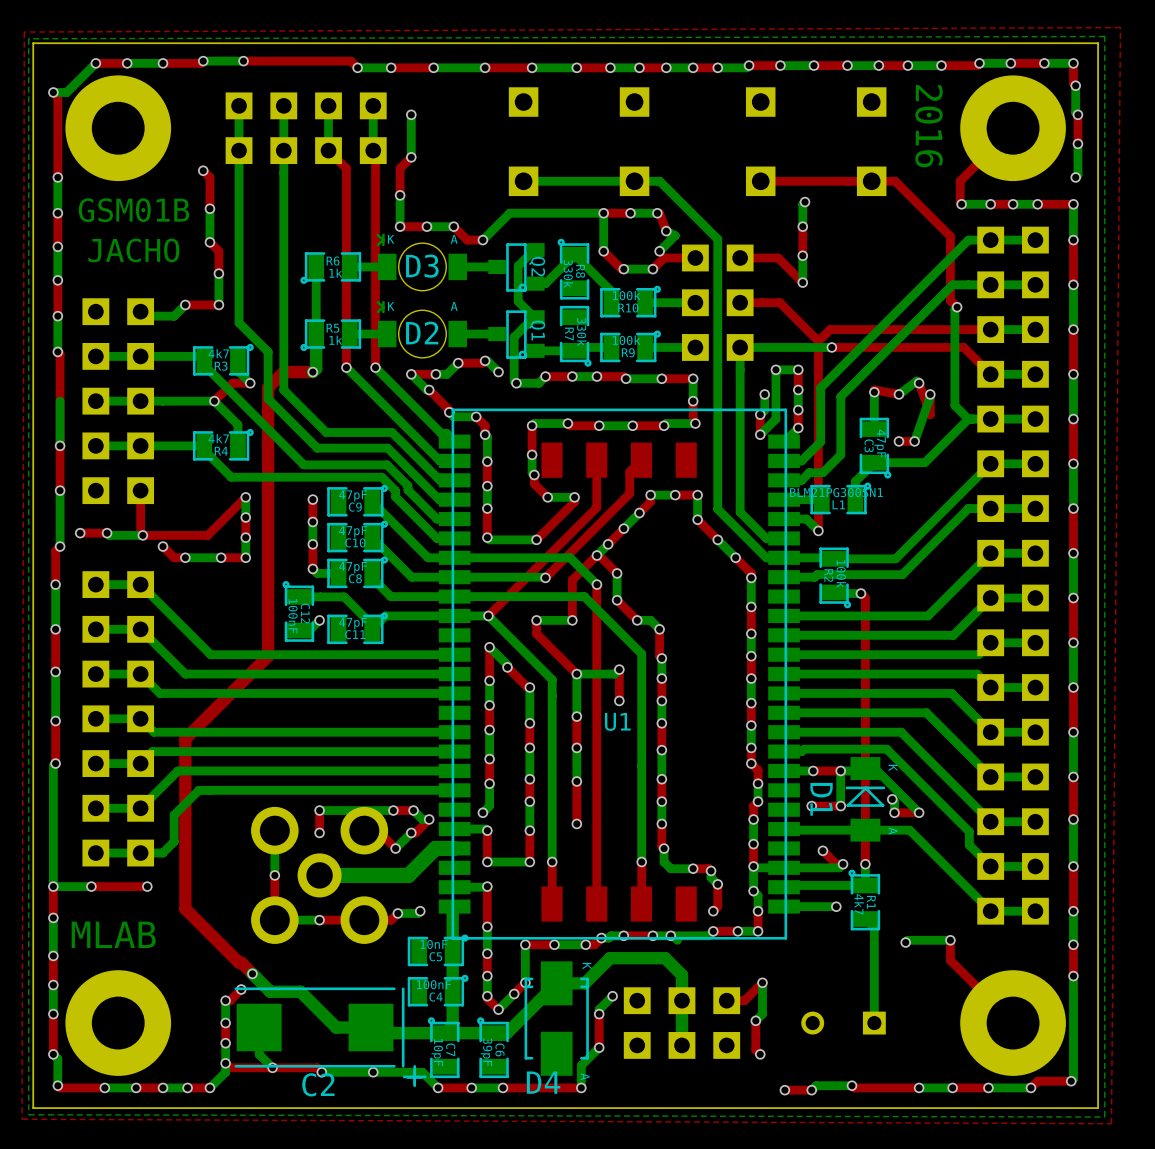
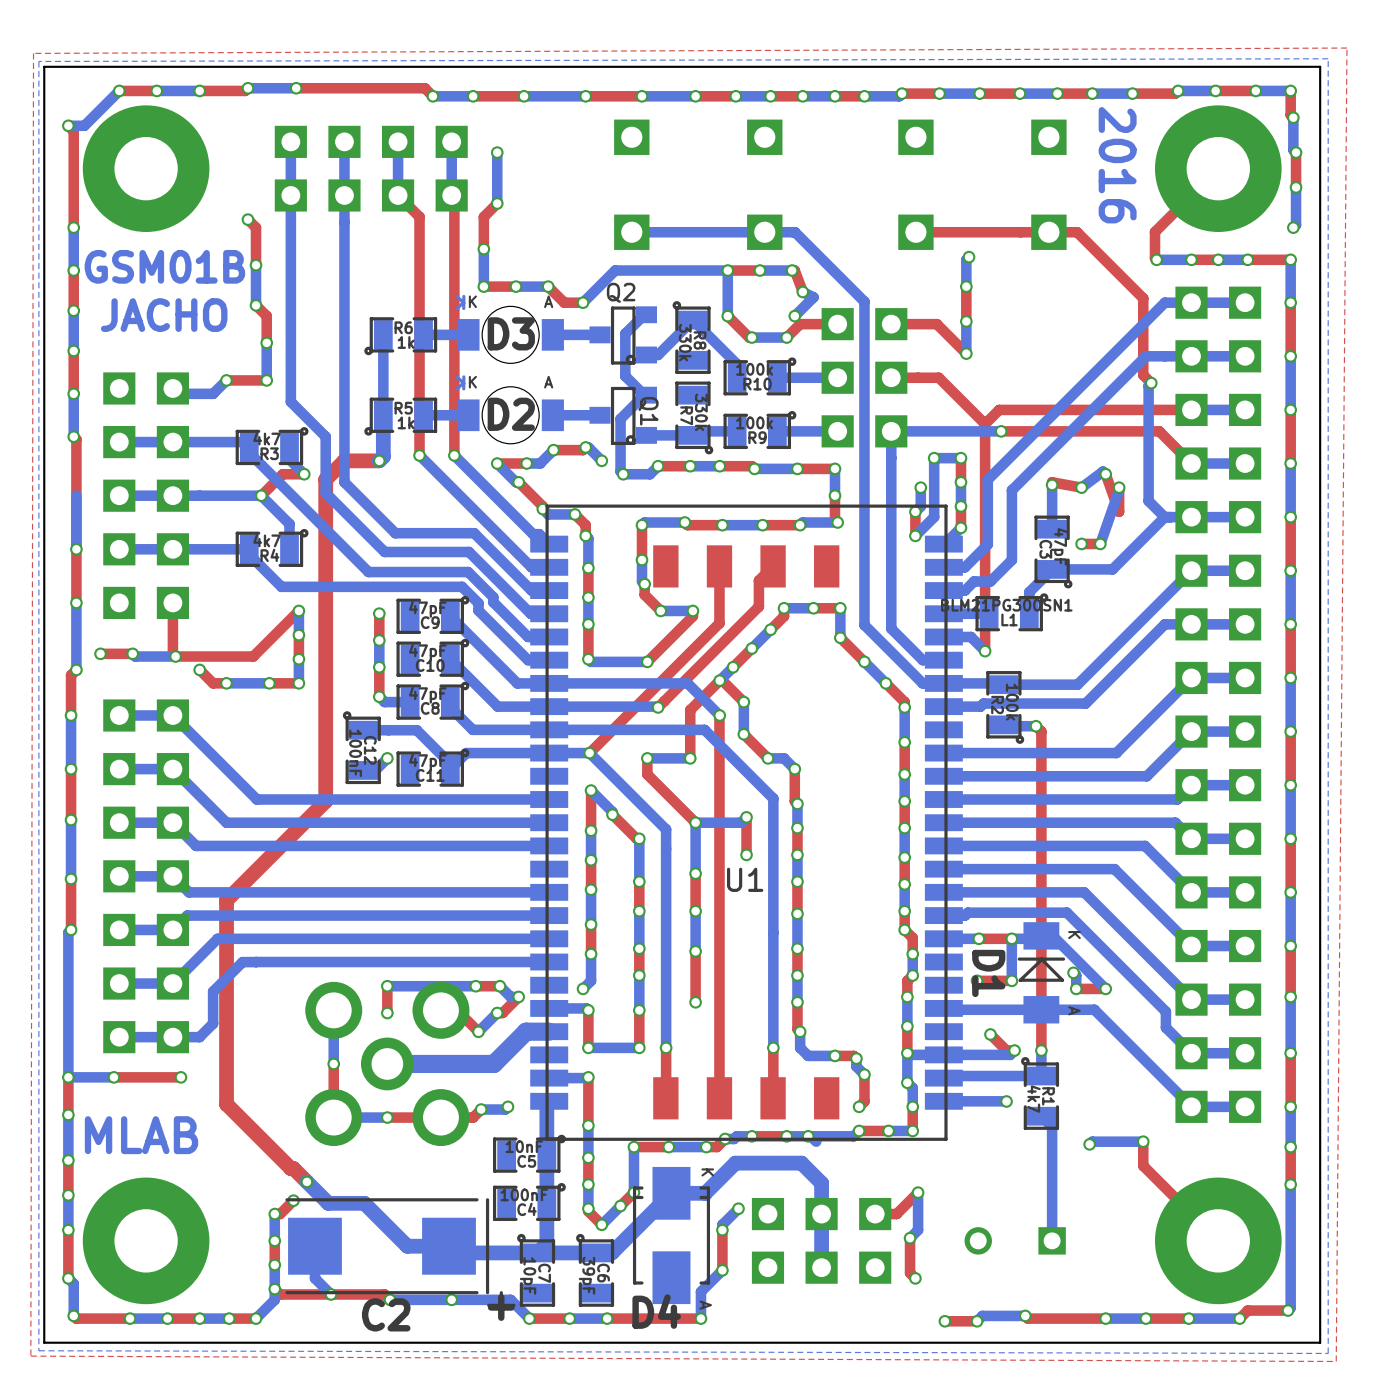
Q2 name rotation: 0° (537, 266) -> 90° counterclockwise (621, 292)
Q2 name position: Q2 (537, 266) -> Q2 (621, 292)

